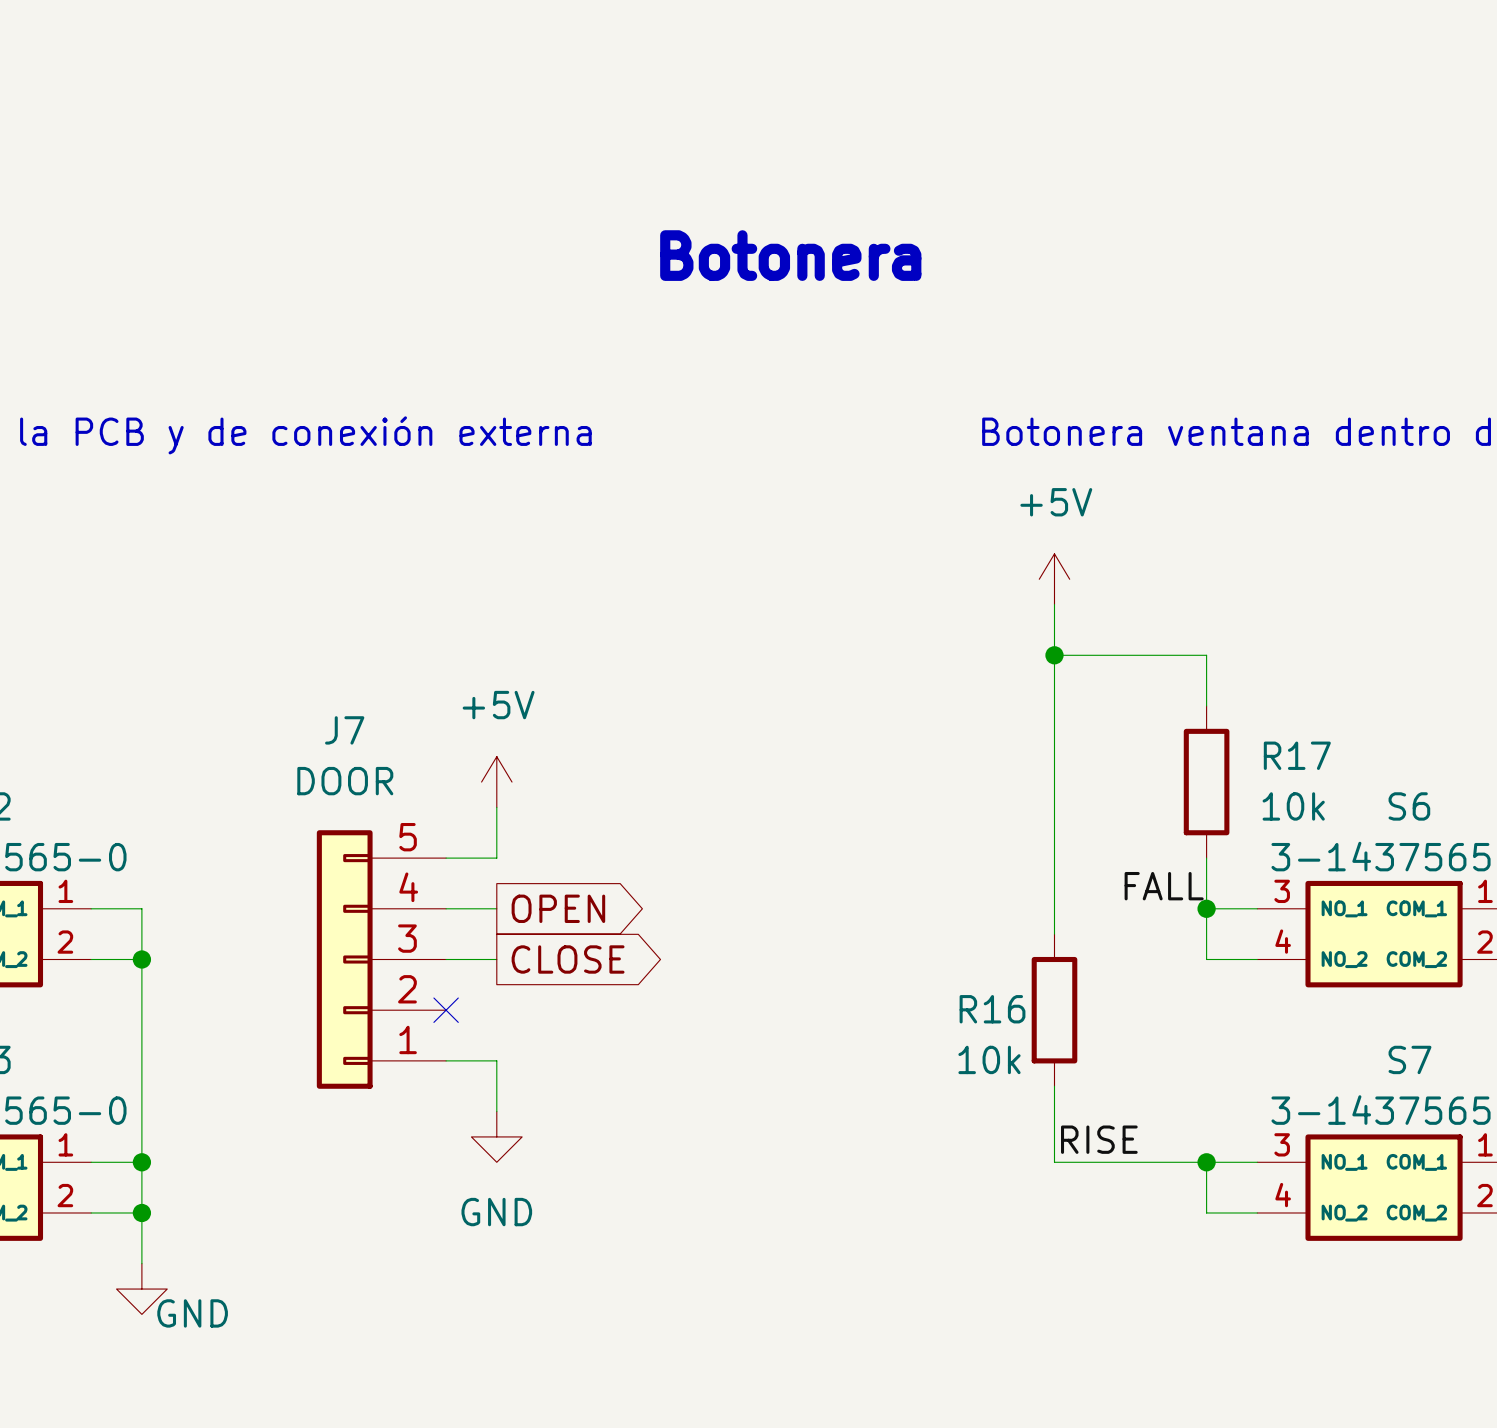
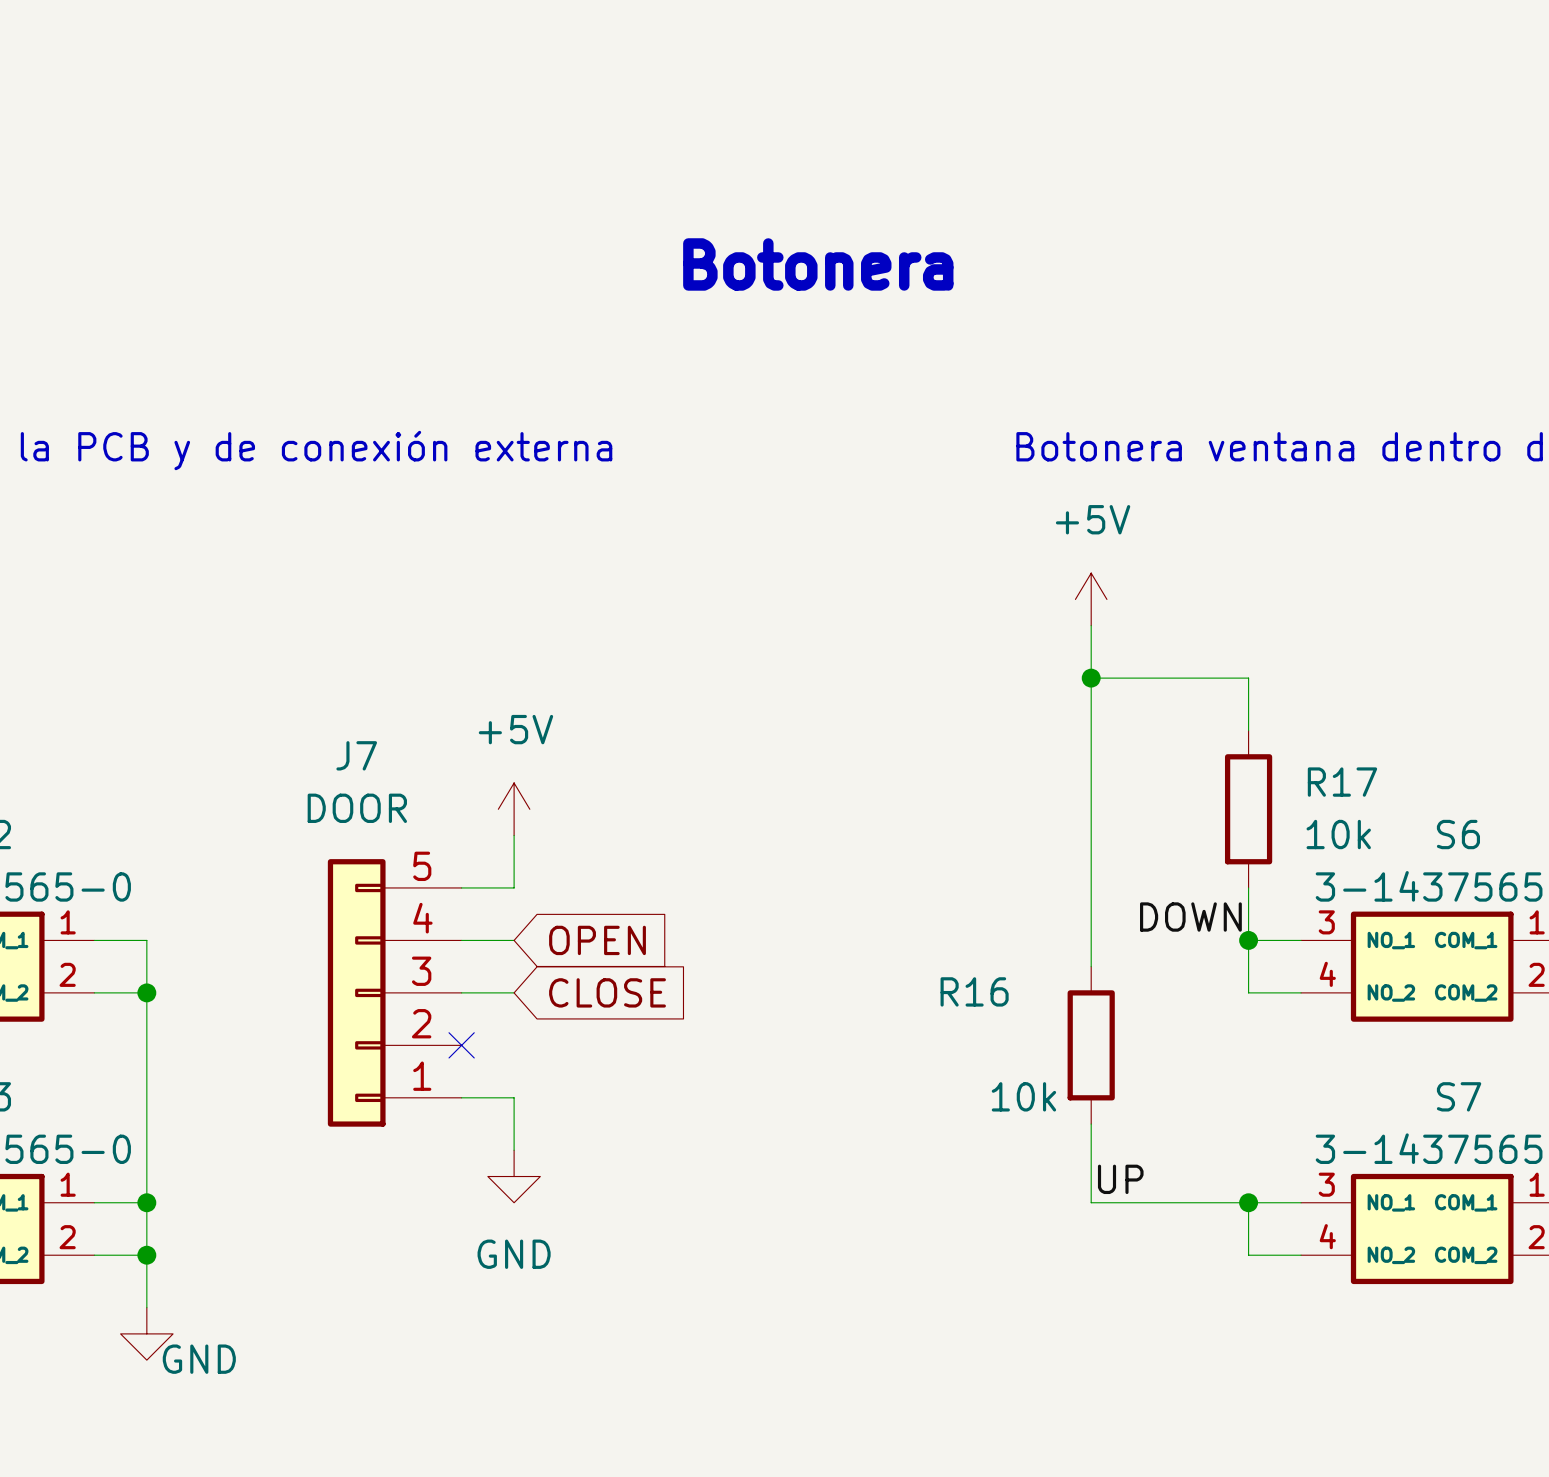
label: FALL (1164, 886) -> DOWN (1190, 917)
global label shape: output (558, 908) -> input (597, 940)
global label shape: output (568, 959) -> input (607, 992)
R16 name position: R16 (992, 1009) -> R16 (974, 991)
label: RISE (1099, 1139) -> UP (1120, 1179)

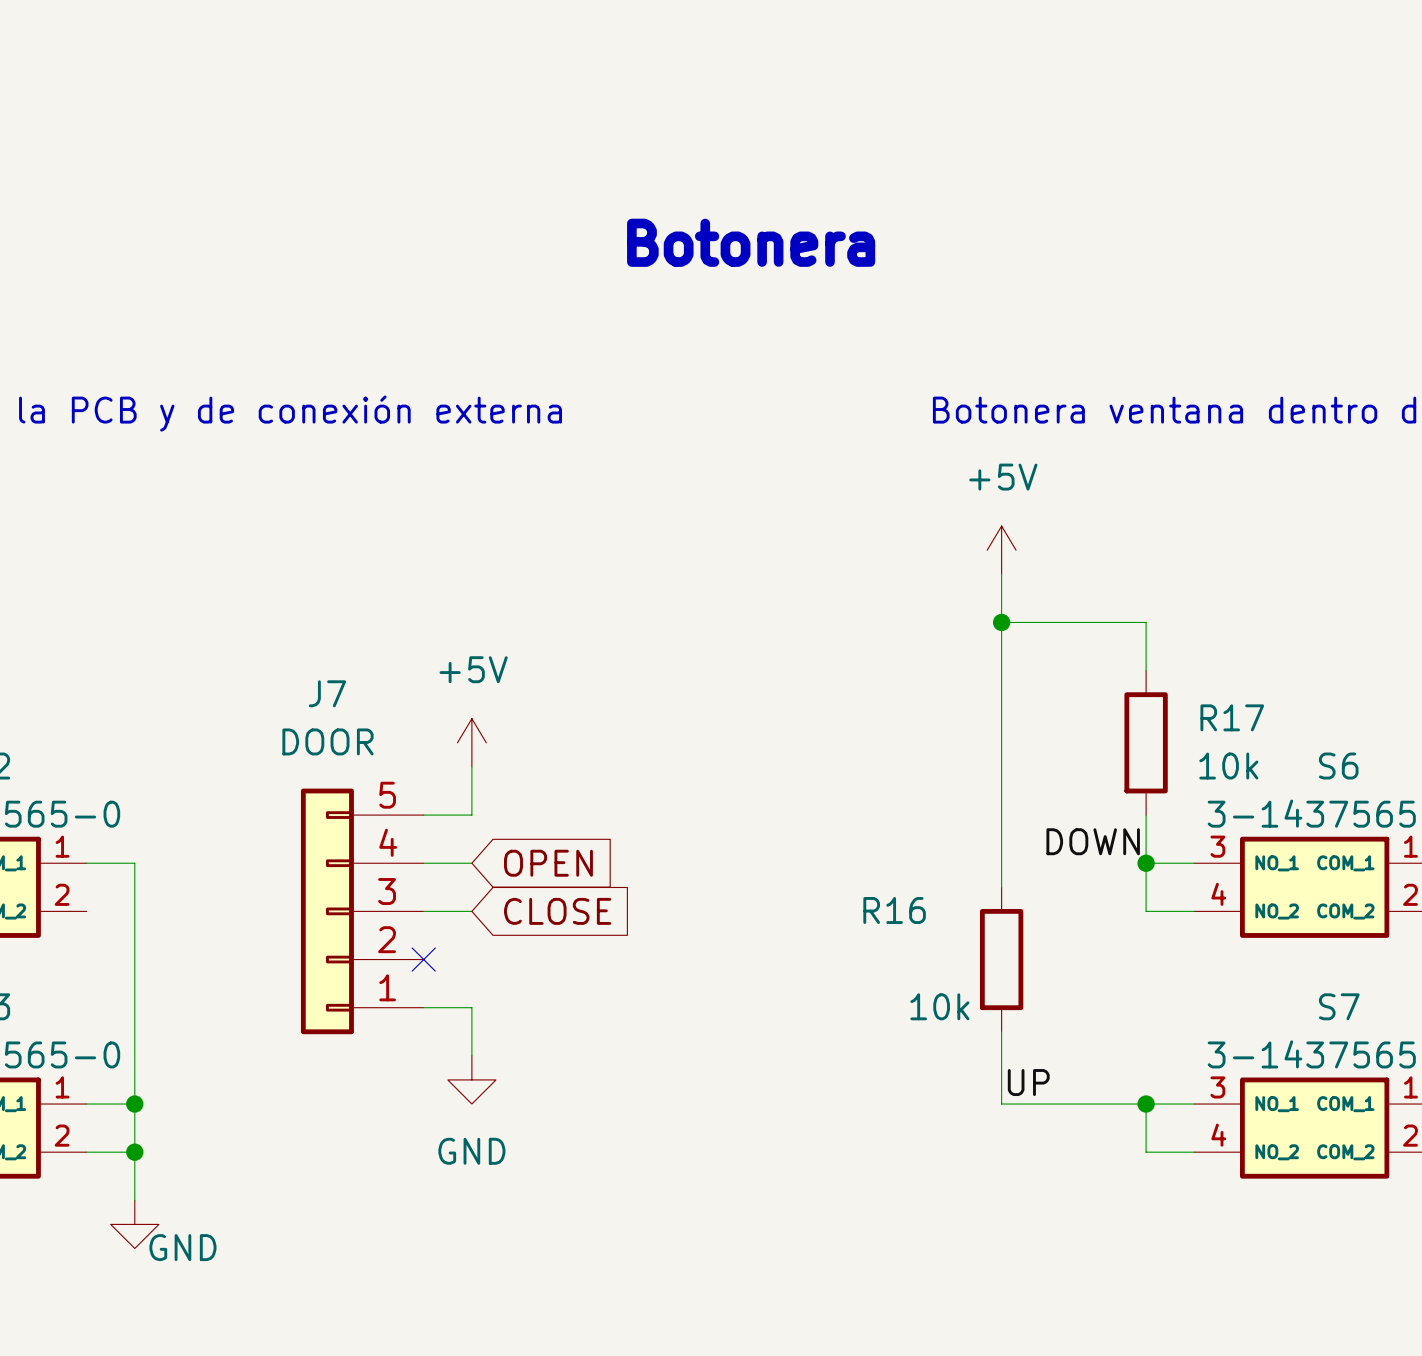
wire: (94, 992) (146, 992) -> none
junction: (146, 992) -> none

